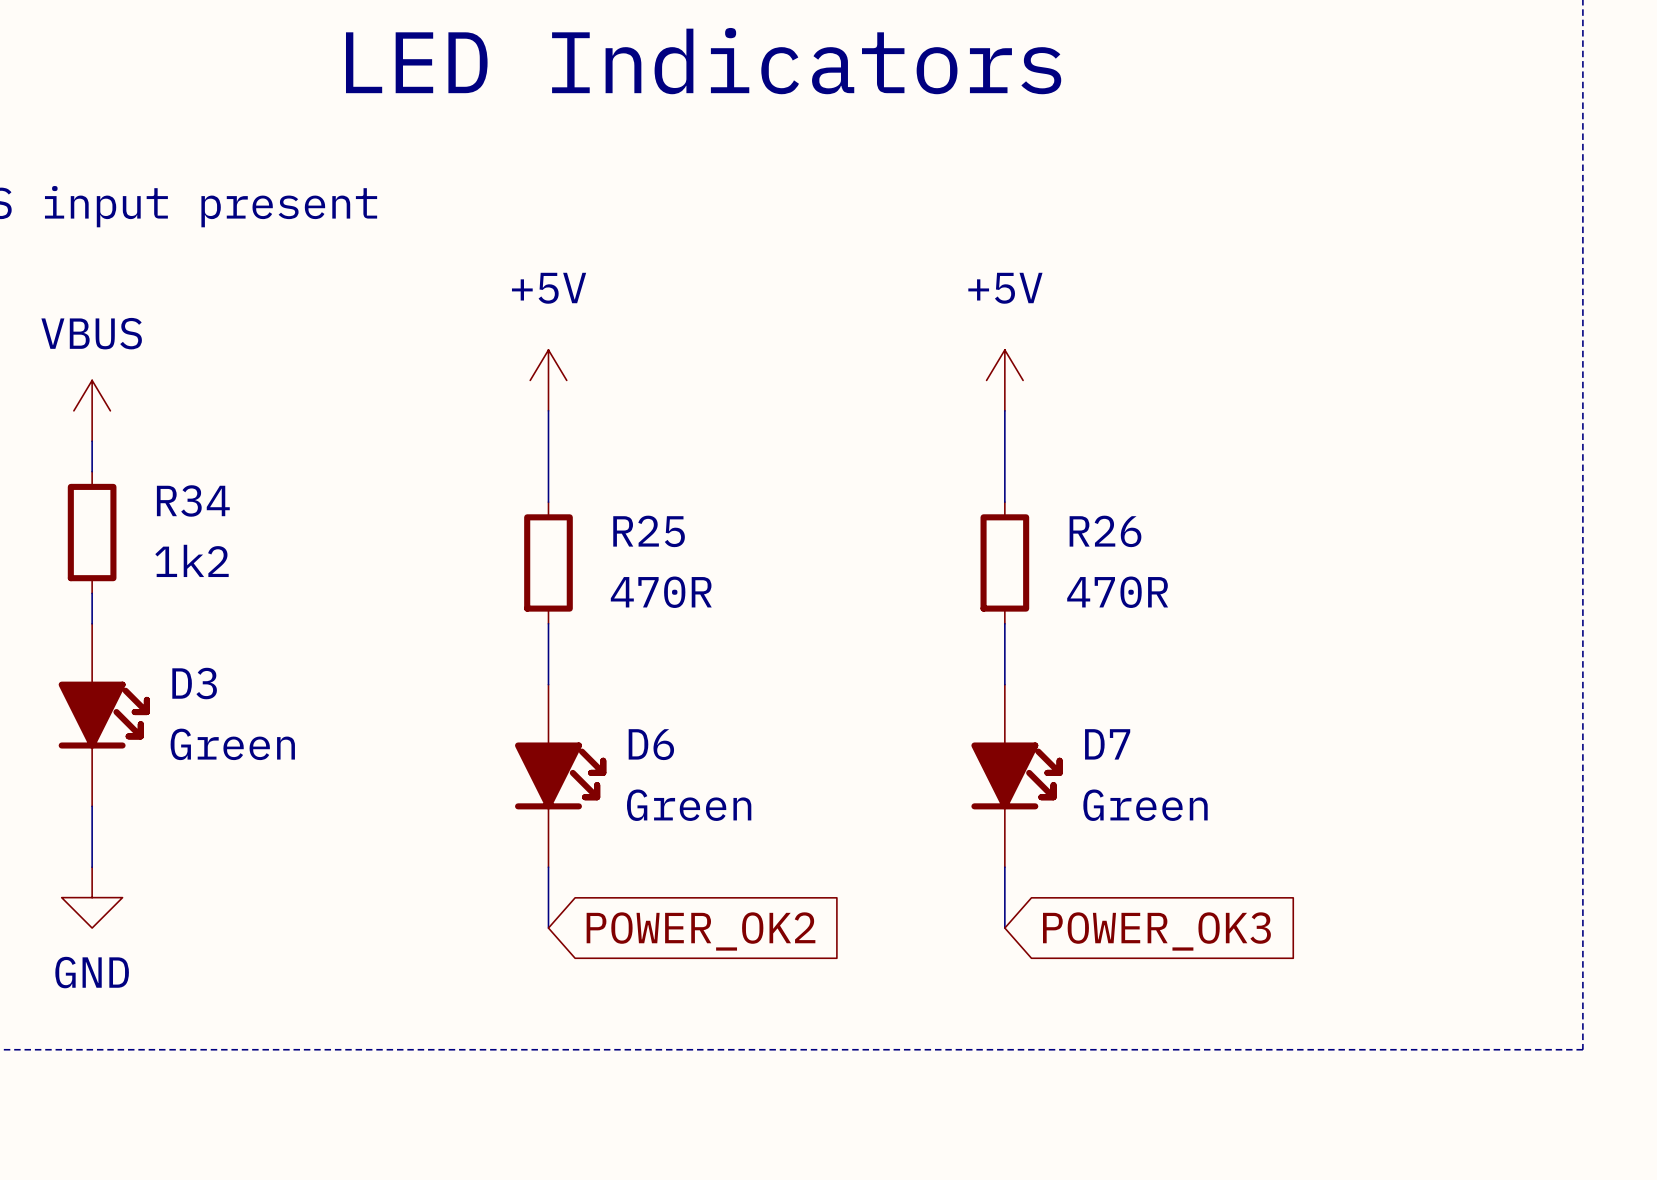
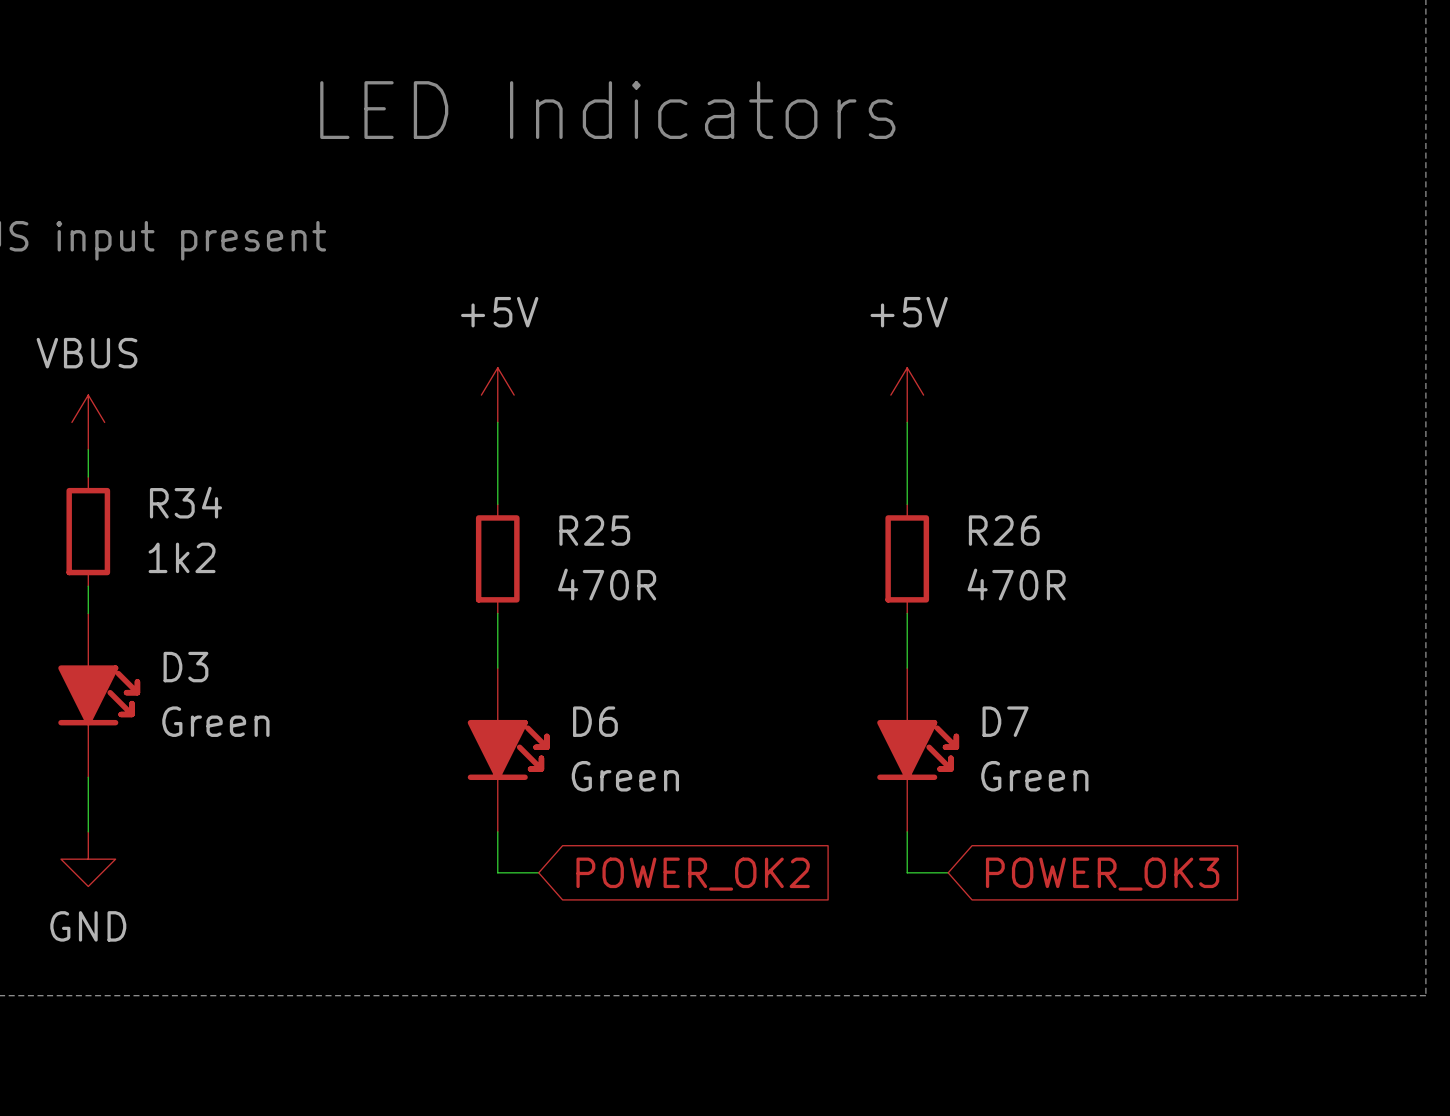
wire: (548, 912) (548, 928) -> (497, 872) (538, 872)
wire: (1004, 912) (1004, 928) -> (907, 872) (948, 872)
global label position: POWER_OK2 (701, 931) -> POWER_OK2 (693, 874)
global label position: POWER_OK3 (1156, 931) -> POWER_OK3 (1102, 874)

